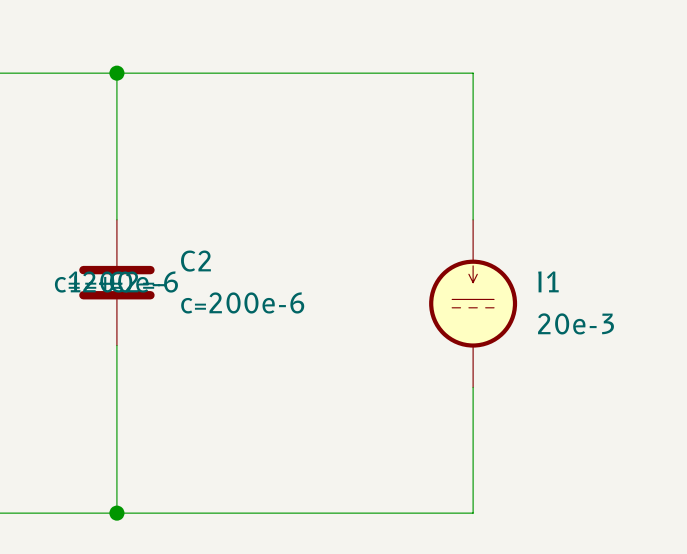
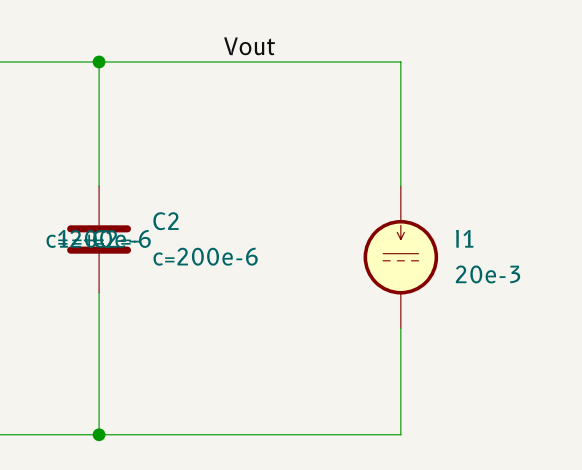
label: none -> Vout (249, 46)

